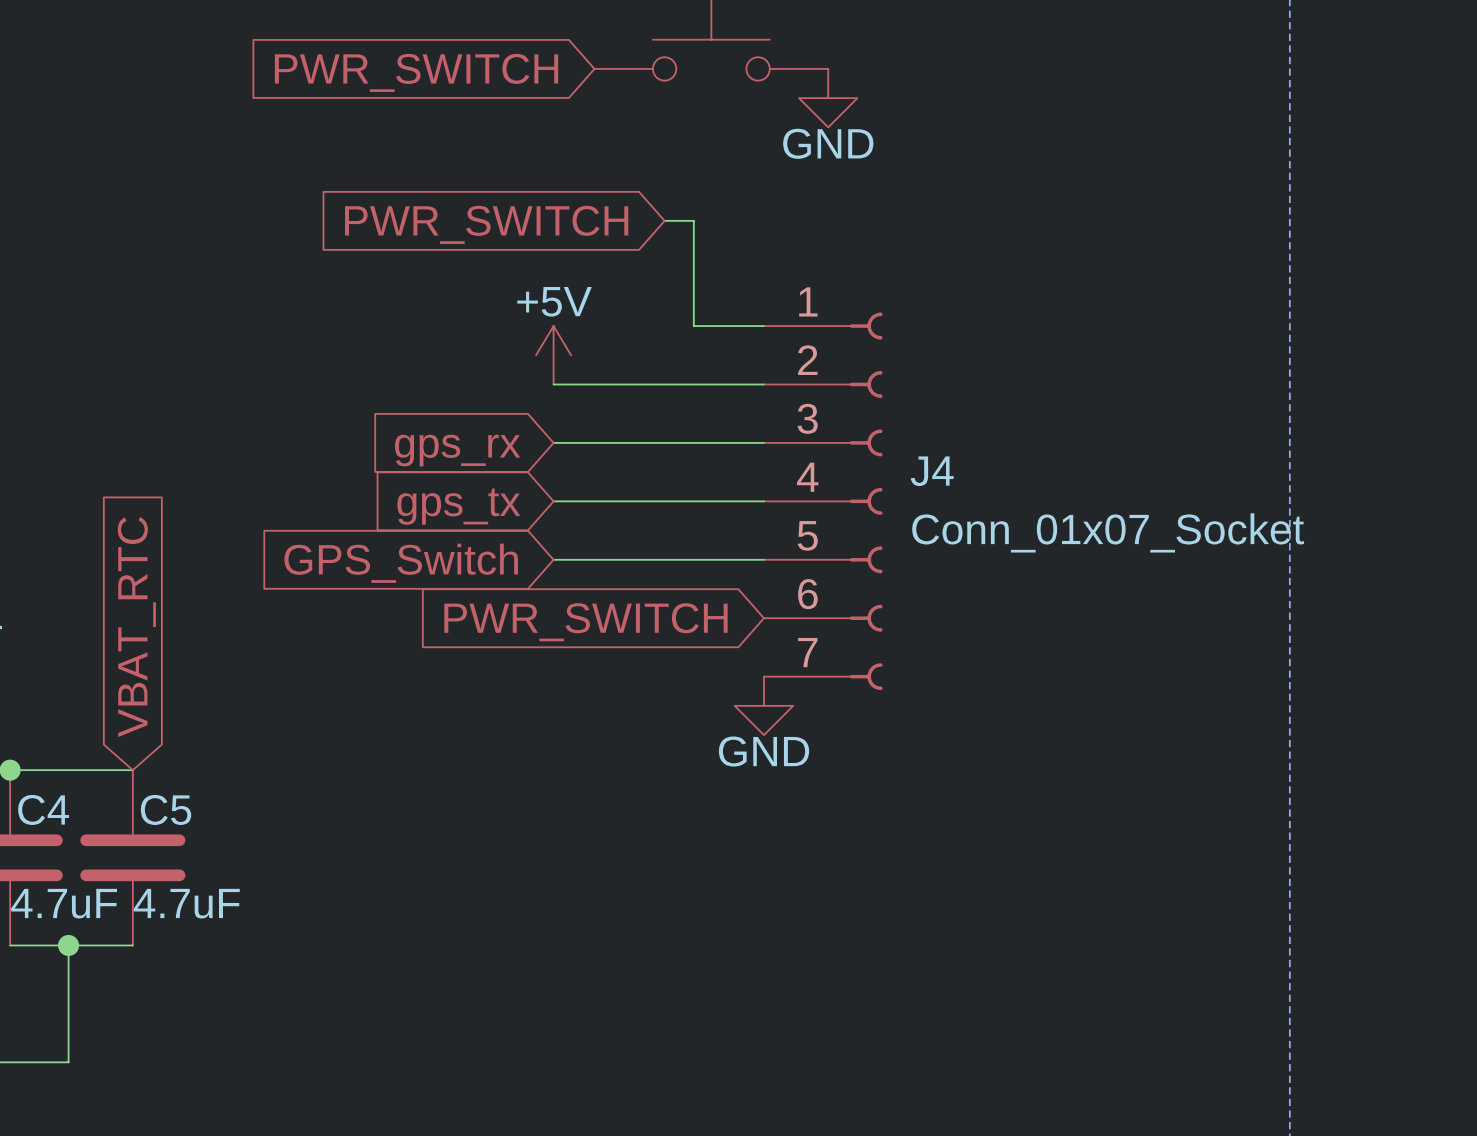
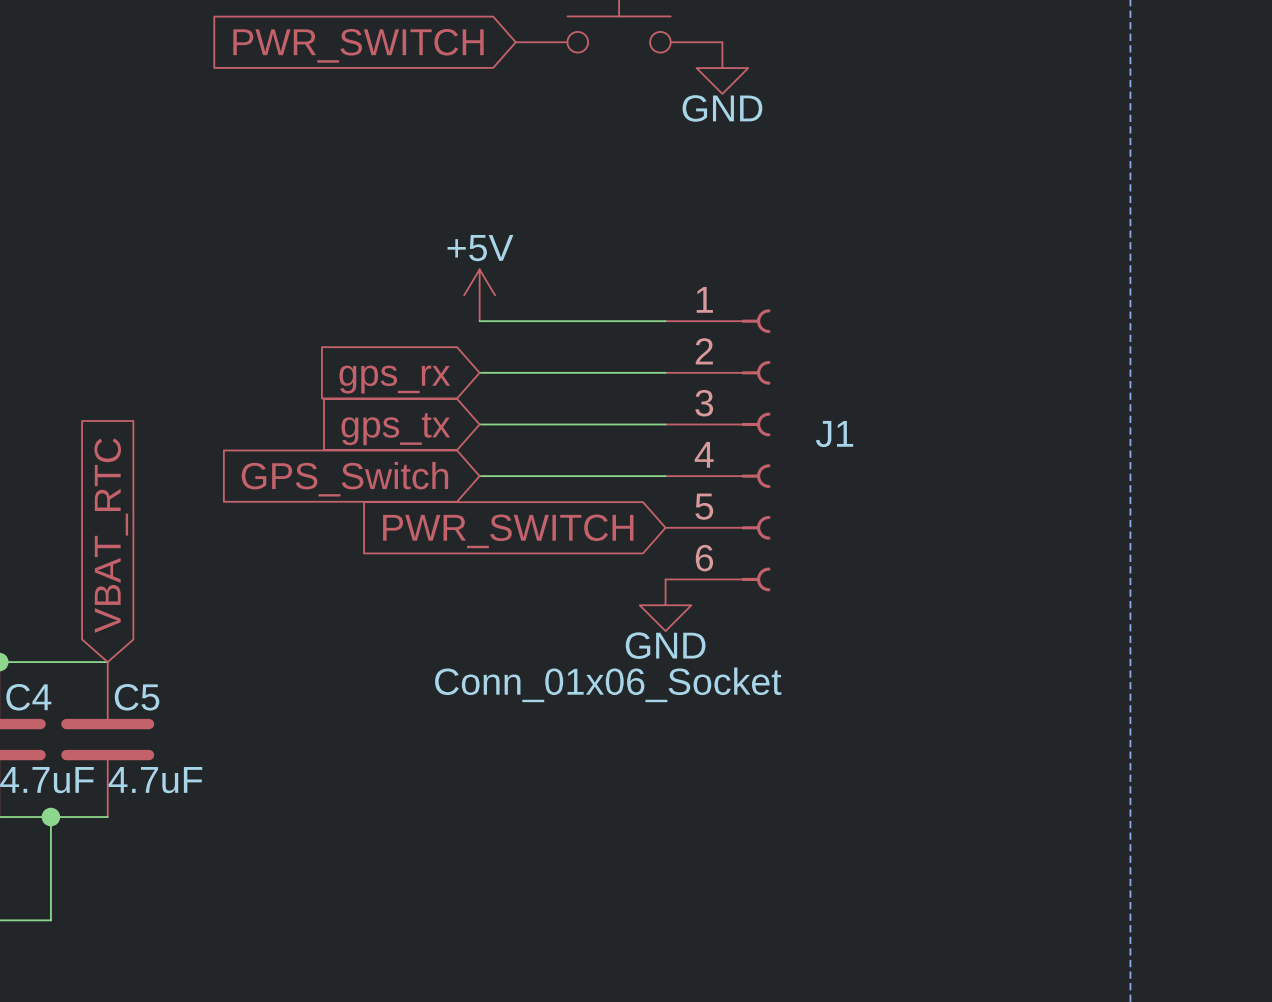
wire: (664, 220) (693, 220) (693, 326) (763, 326) -> none
global label: PWR_SWITCH (486, 224) -> none
J4: Conn_01x07_Socket (823, 501) -> none
J1: none -> Conn_01x06_Socket (718, 450)

